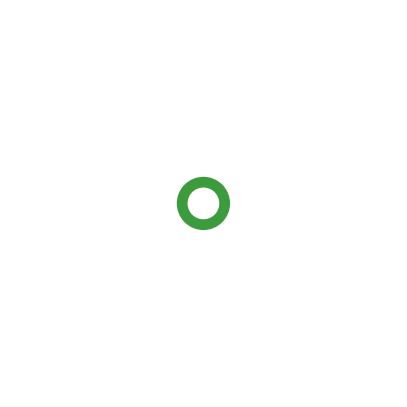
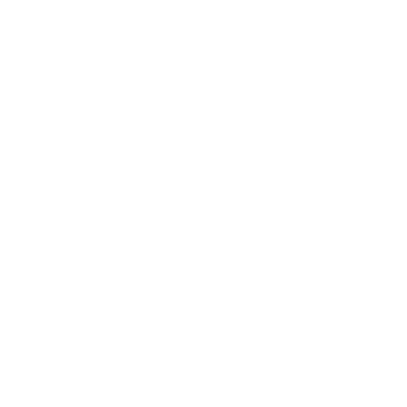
via: (203, 203) -> none

